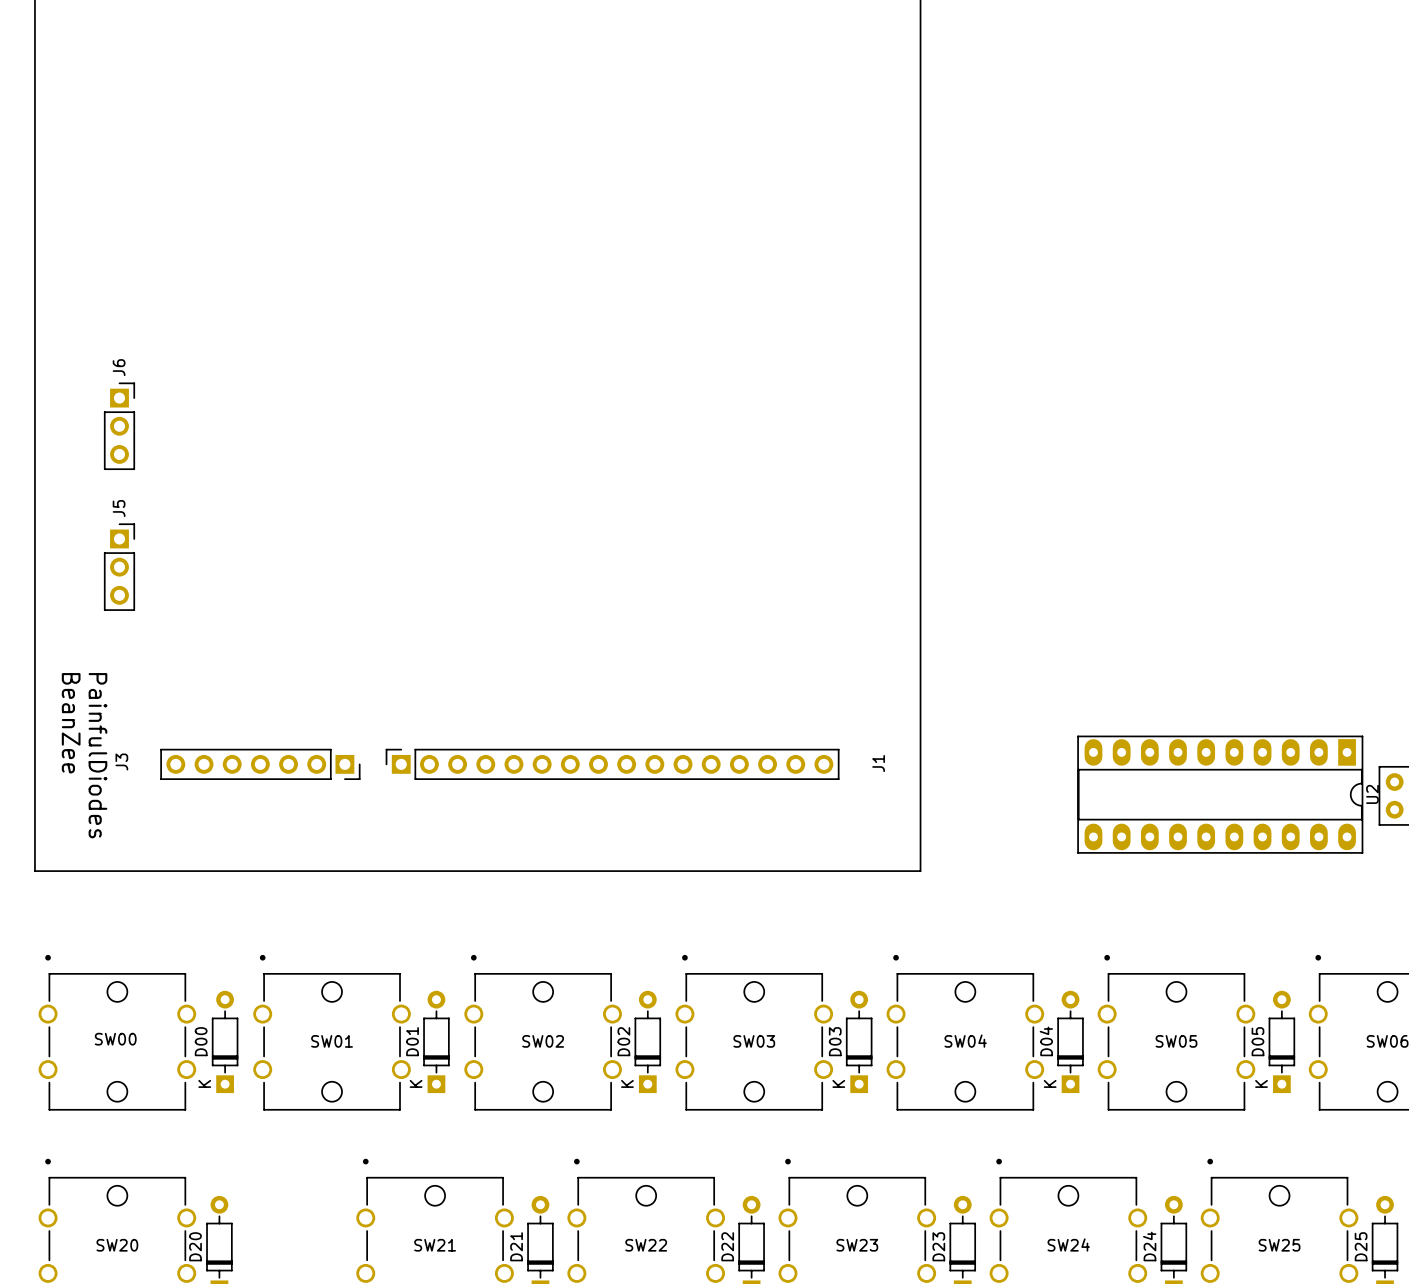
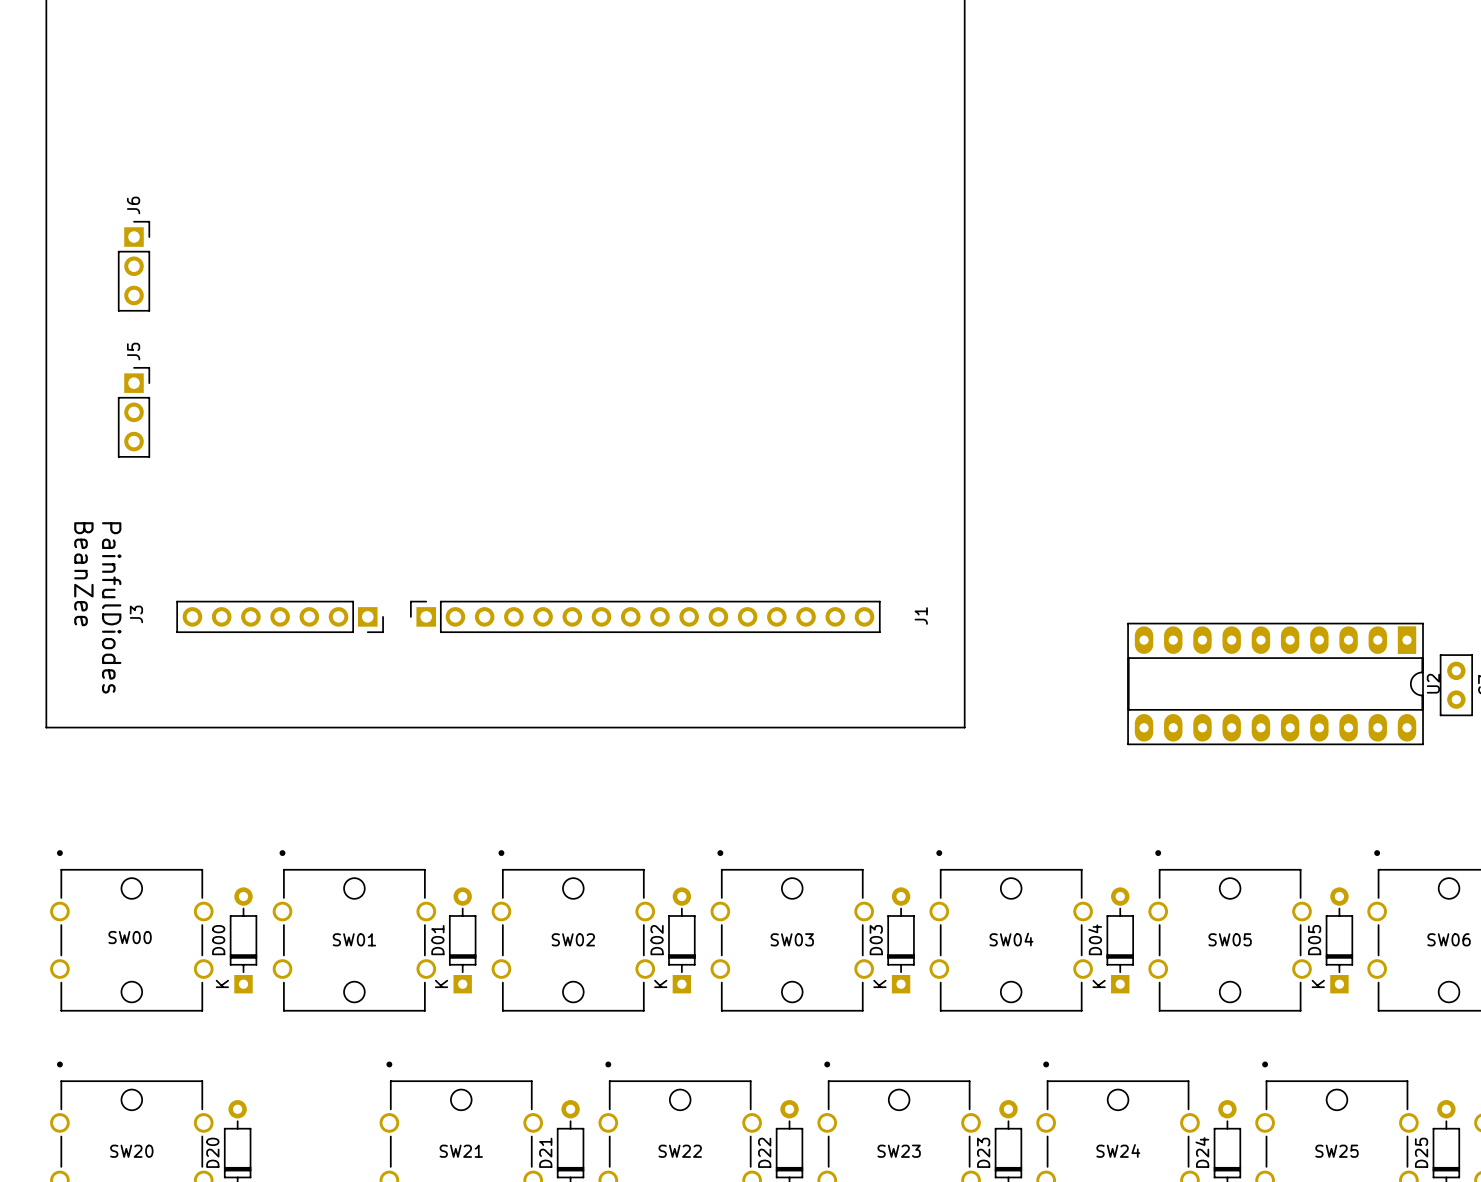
J6 position: (119, 426) -> (134, 266)
J5 position: (119, 567) -> (134, 412)
text position: BeanZee (71, 723) -> BeanZee (83, 574)
text position: PainfulDiodes (97, 755) -> PainfulDiodes (111, 607)
J3 position: (260, 764) -> (280, 616)
J1 position: (612, 764) -> (645, 616)
line: (34, 836) (34, 871) (920, 871) (920, 836) -> (46, 727) (964, 727)

